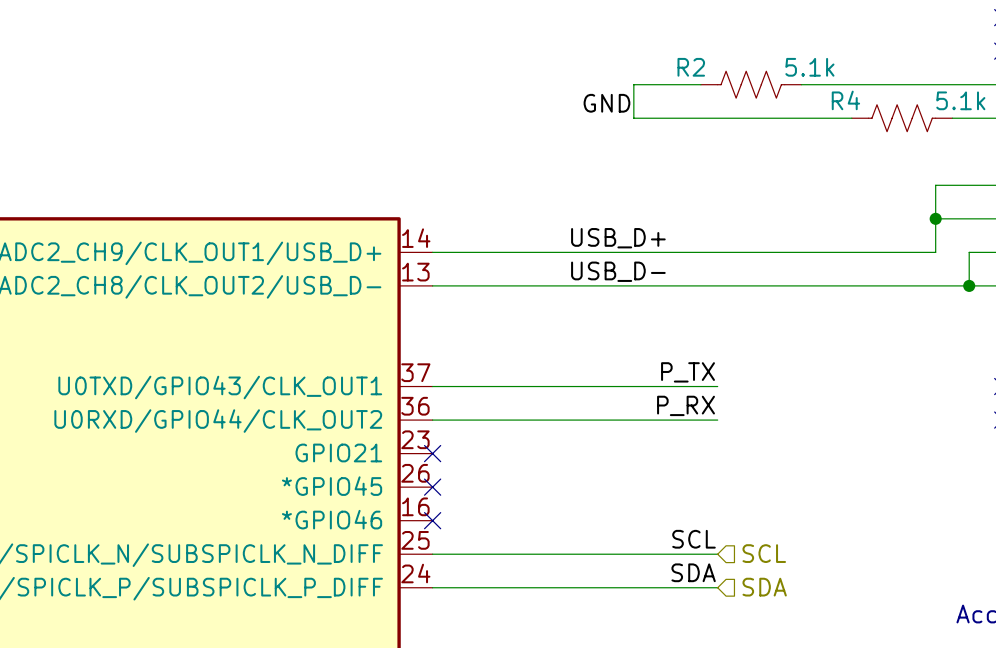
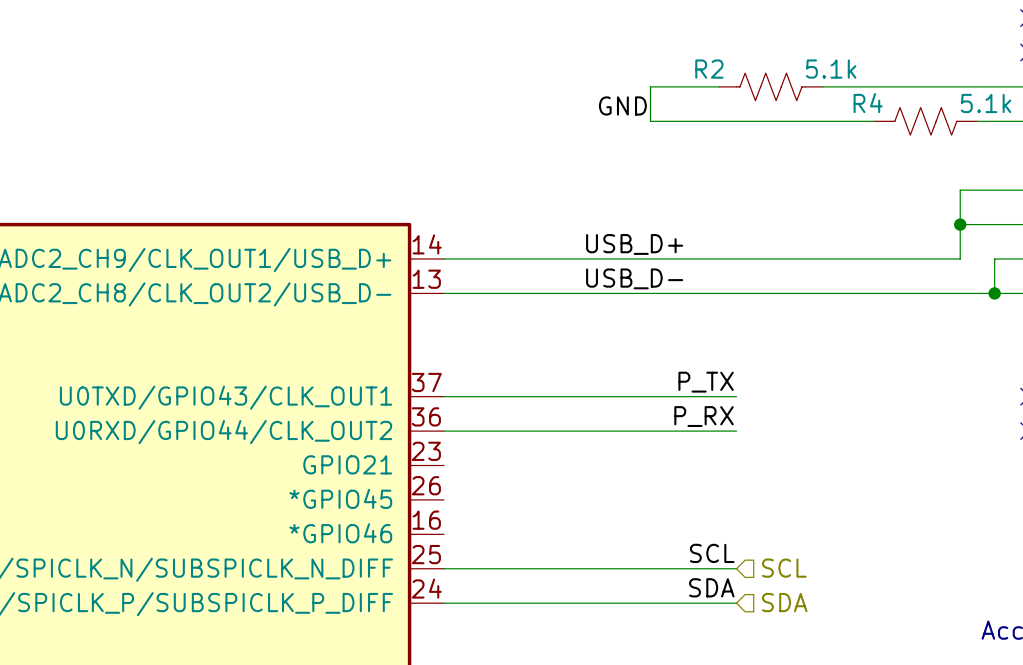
no-connect mark: (432, 453) -> none
no-connect mark: (432, 487) -> none
no-connect mark: (432, 520) -> none

